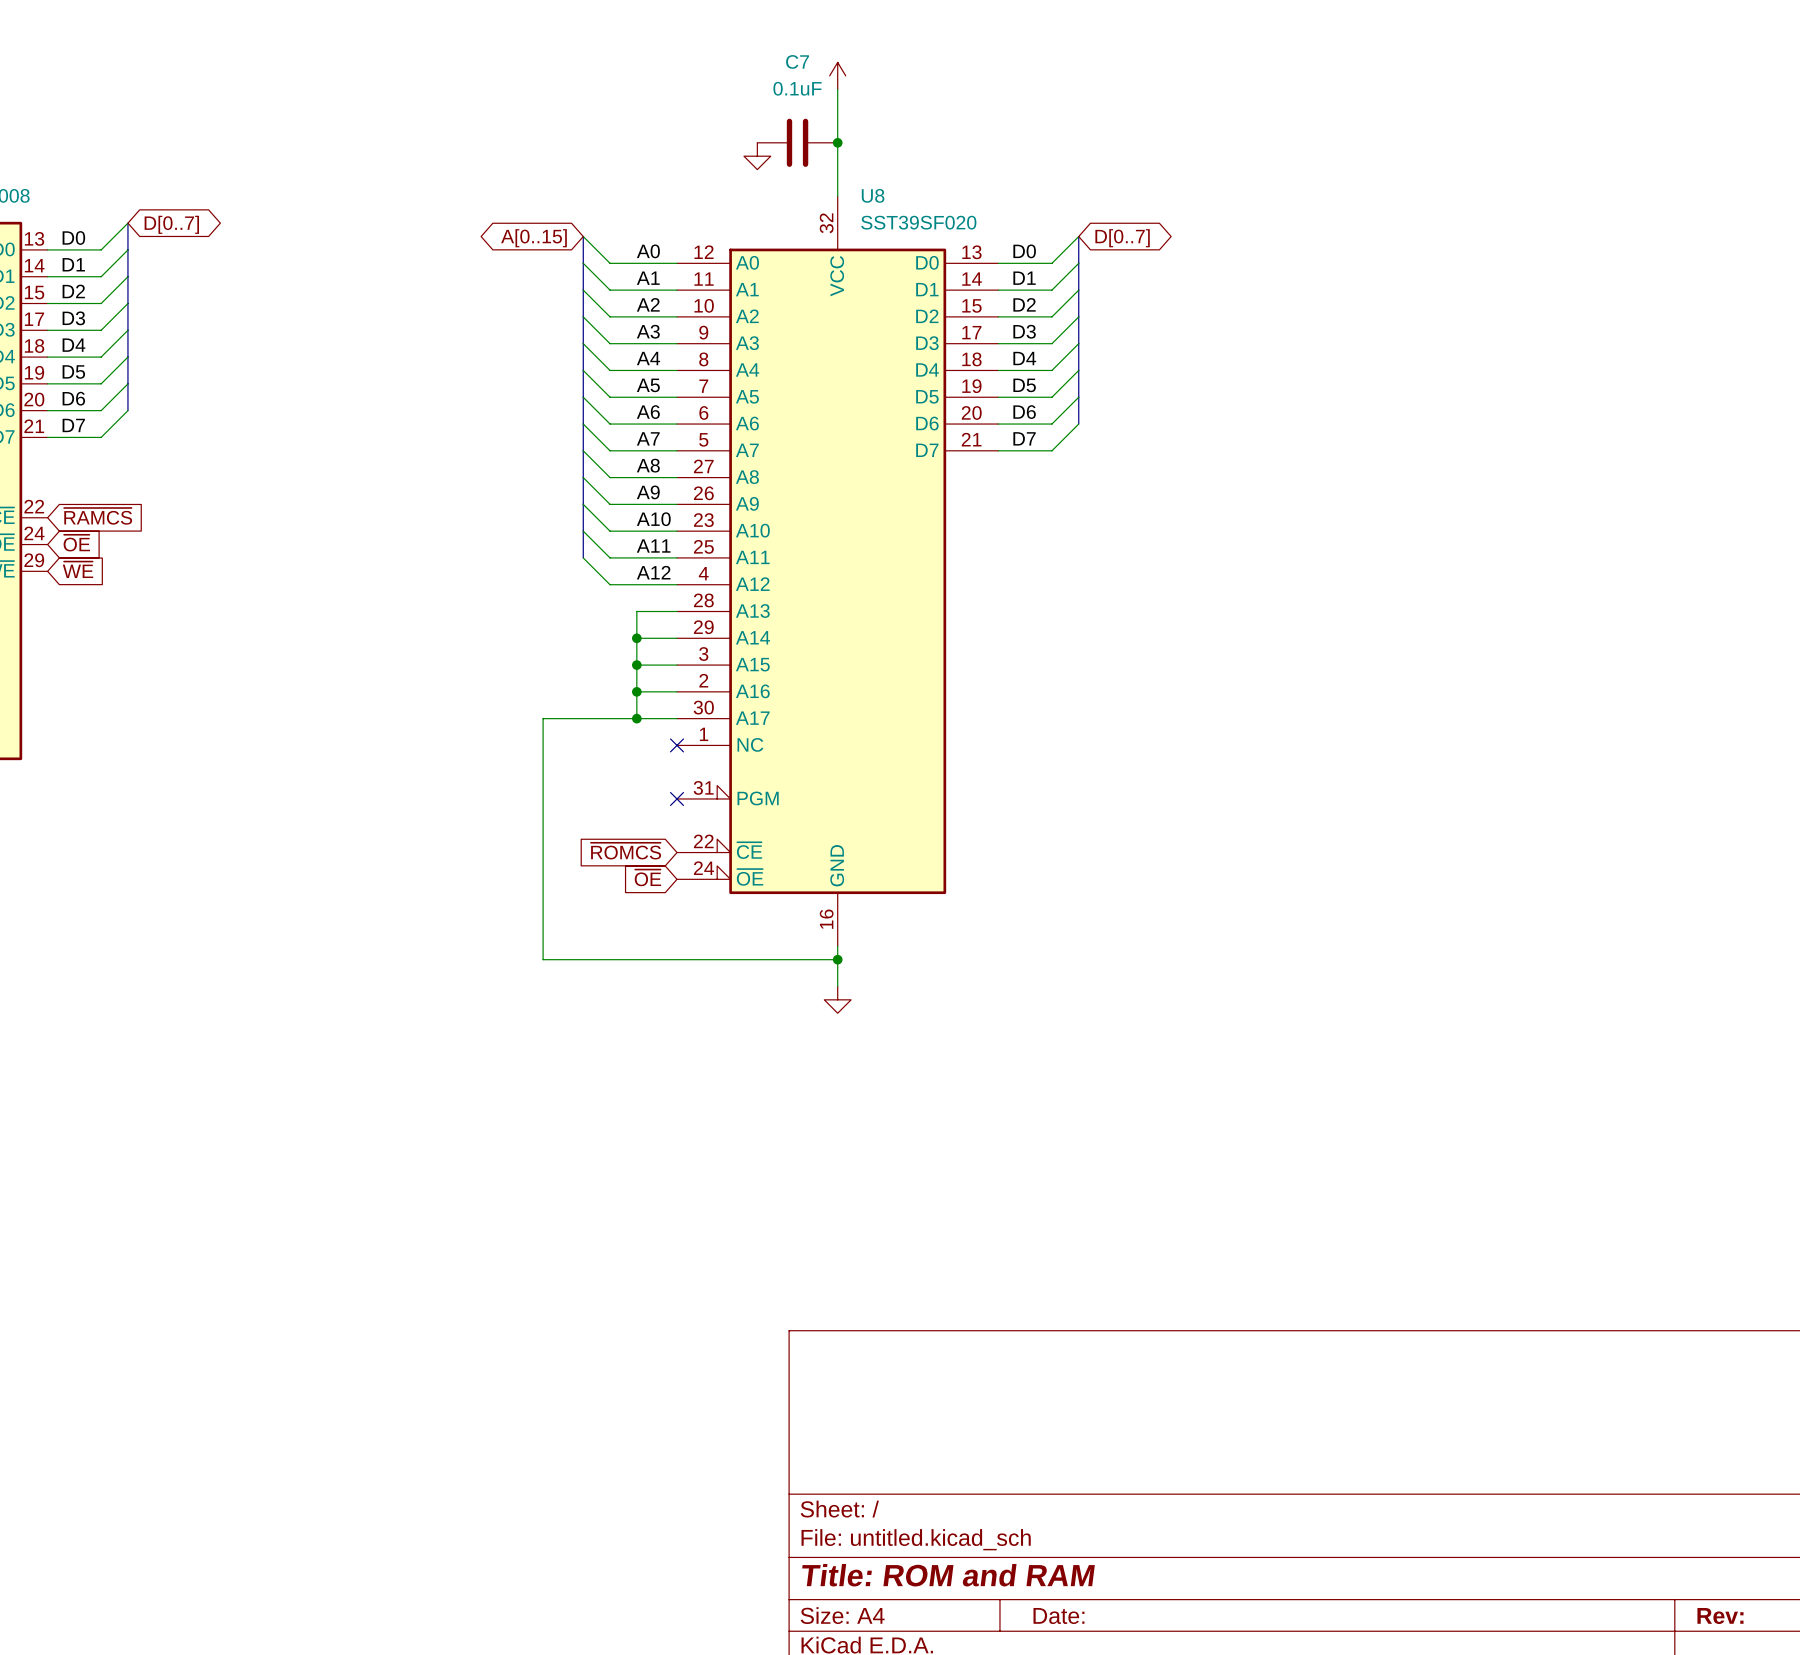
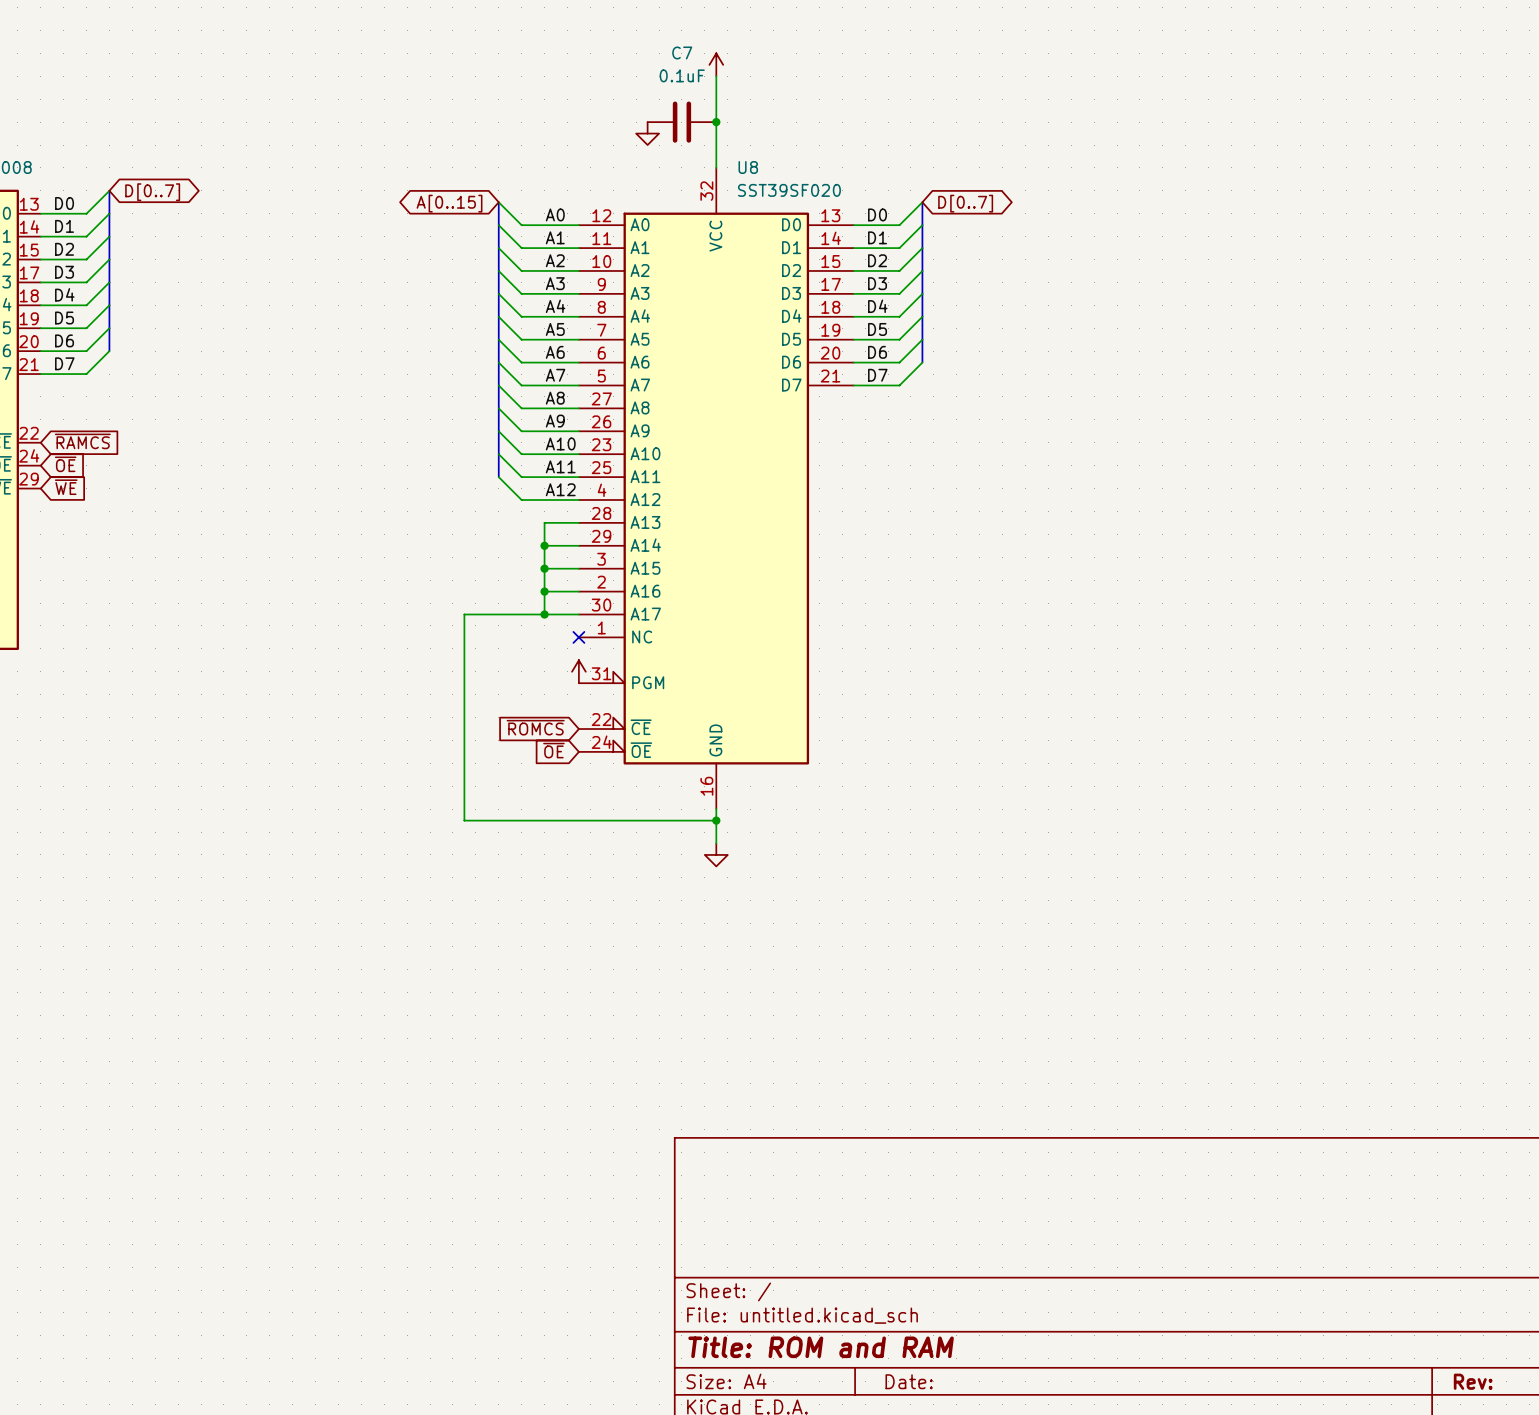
power symbol: none -> (578, 671)
no-connect mark: (677, 798) -> none

